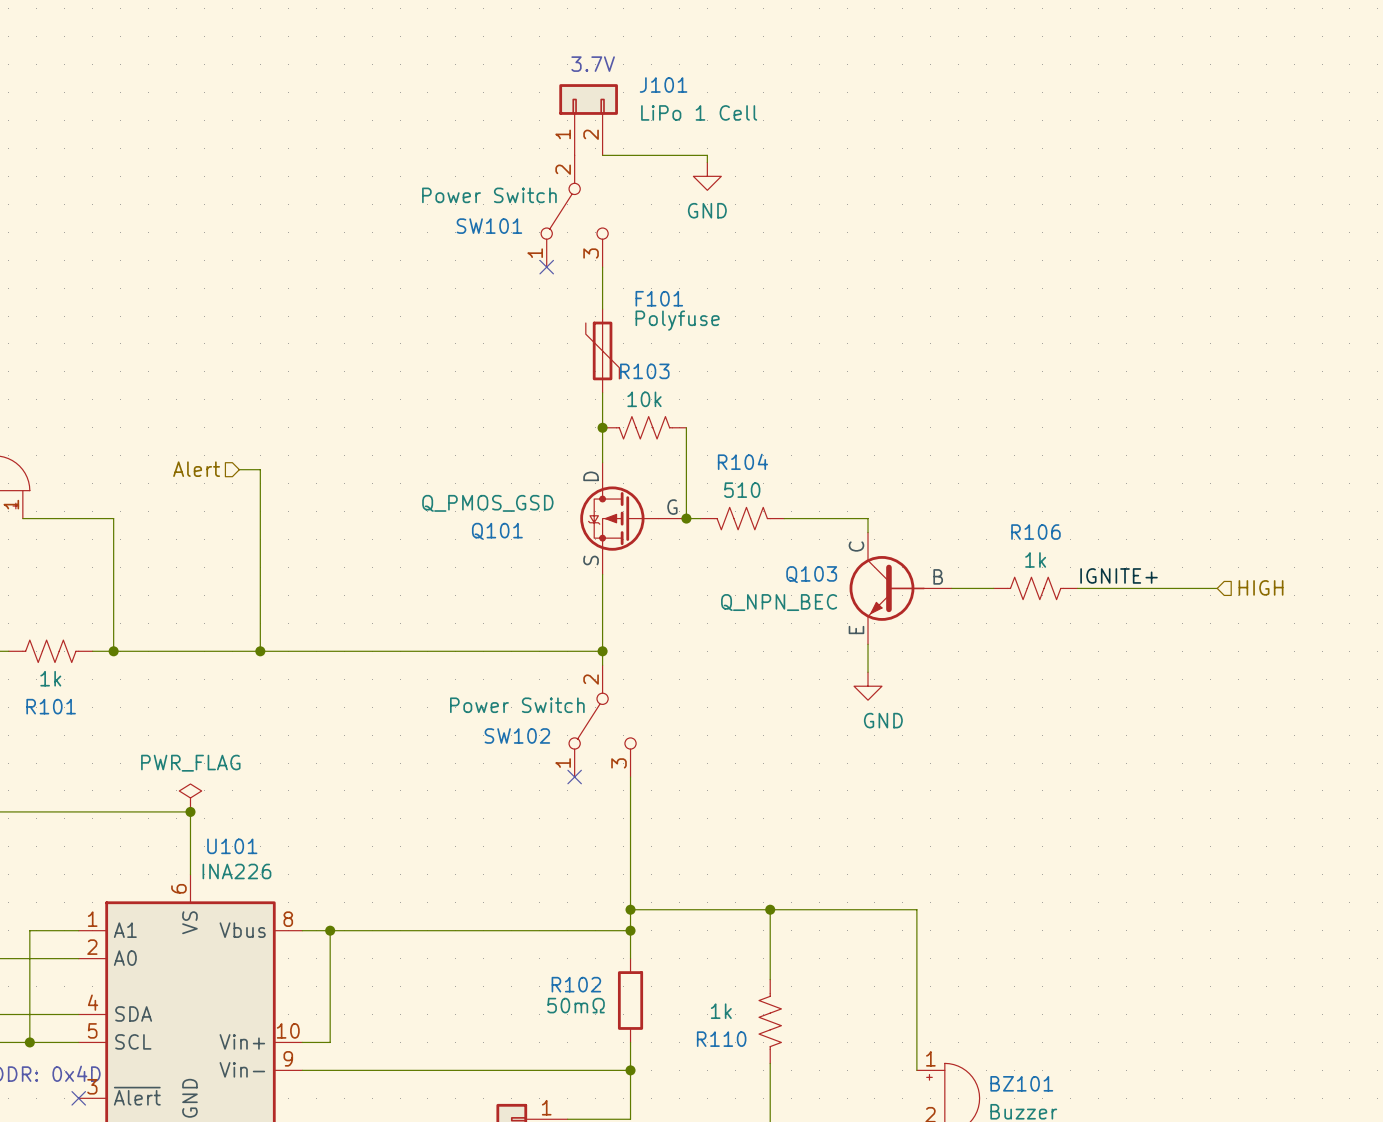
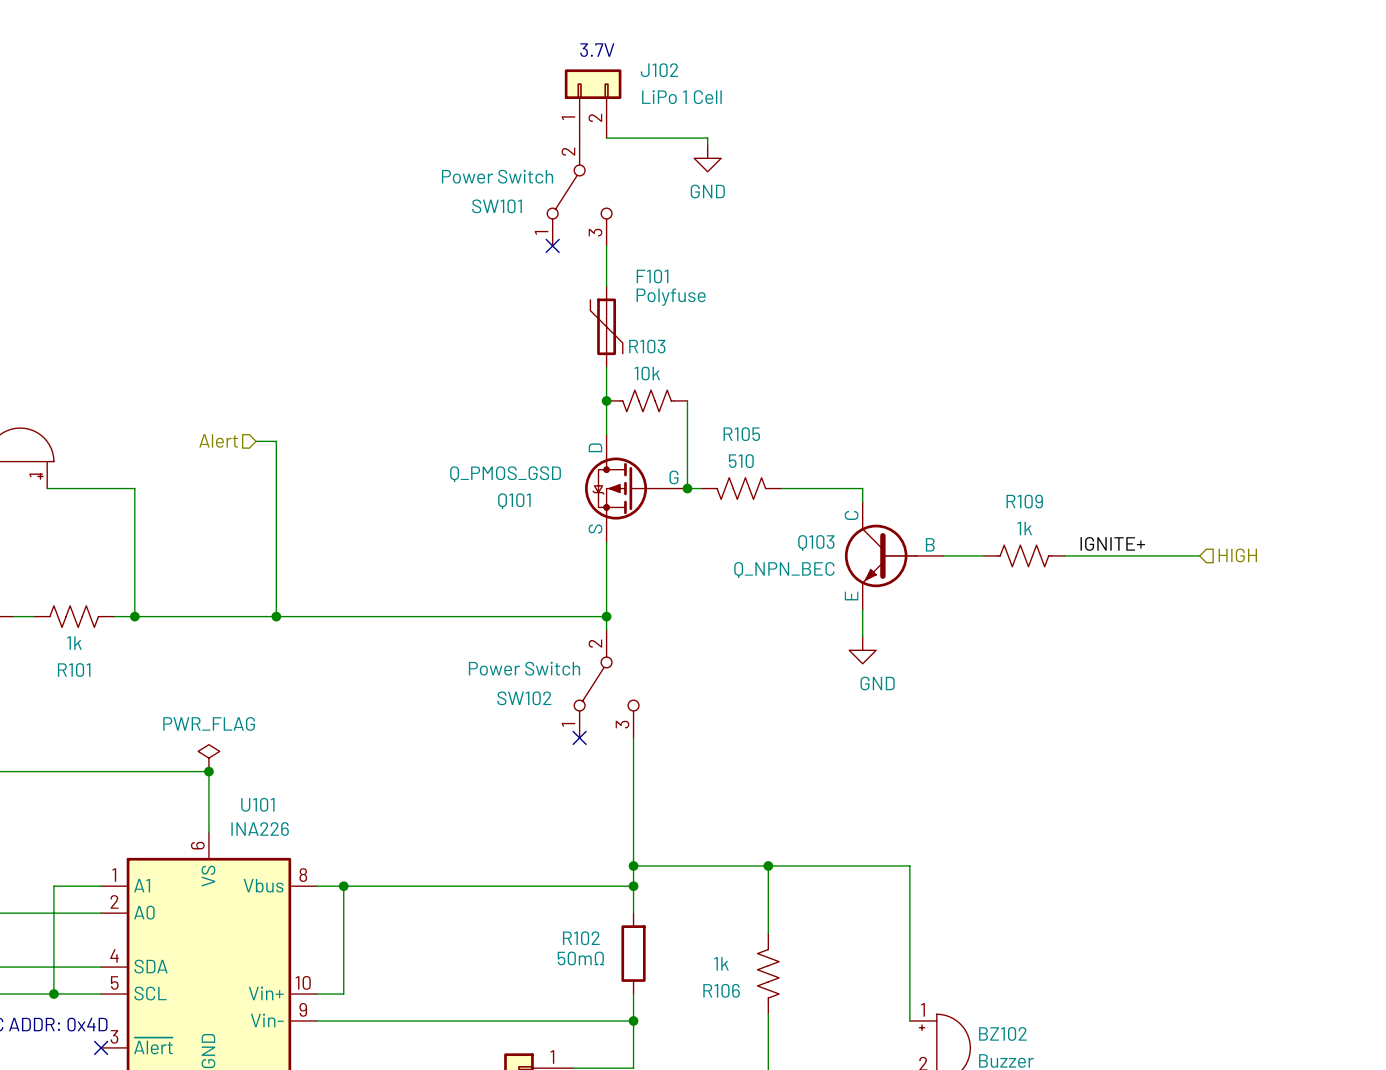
J101 name: J101 (663, 85) -> J102 (659, 70)
R104 name: R104 (742, 461) -> R105 (741, 434)
R106 name: R106 (1035, 532) -> R109 (1024, 501)
R110 name: R110 (721, 1039) -> R106 (721, 990)
BZ101 name: BZ101 (1021, 1083) -> BZ102 (1002, 1033)

